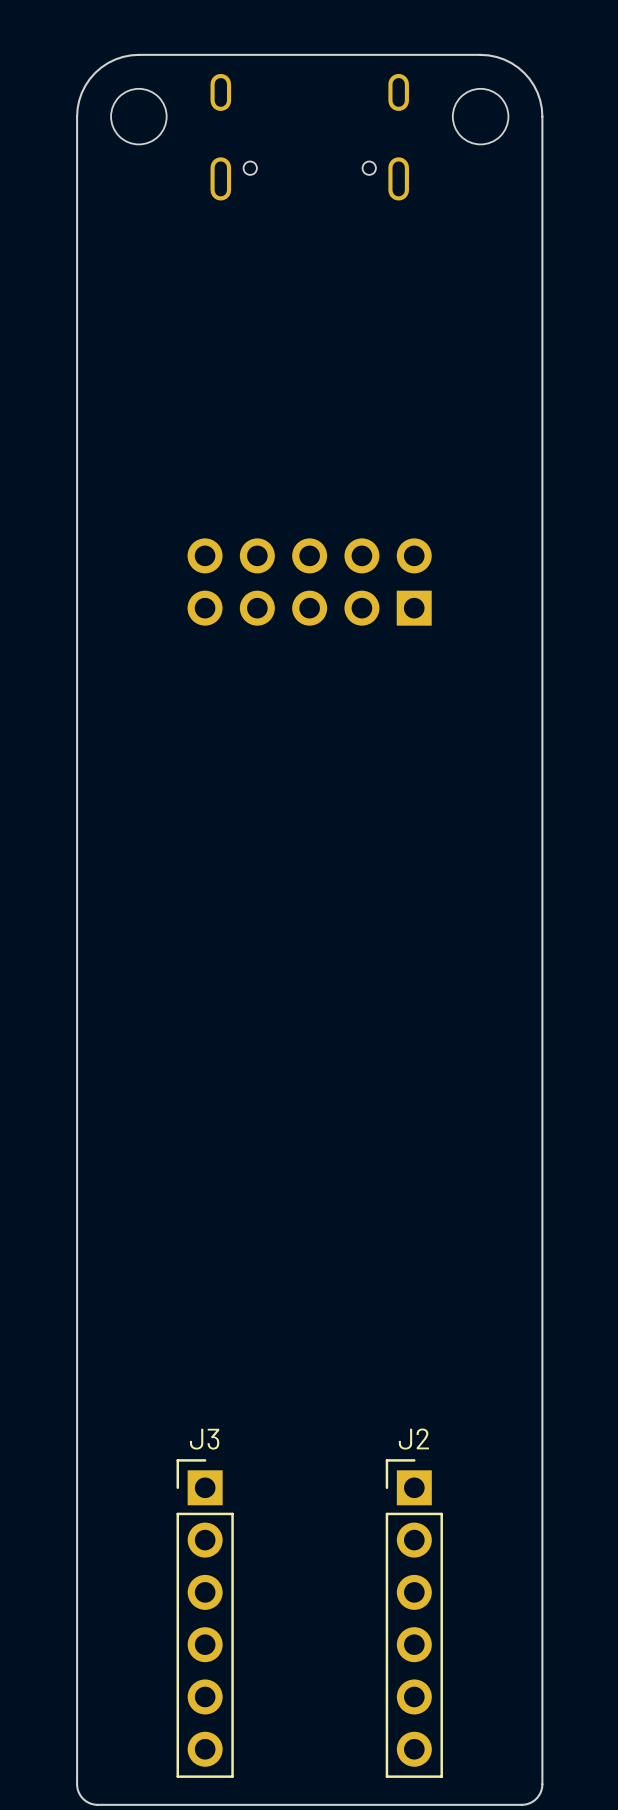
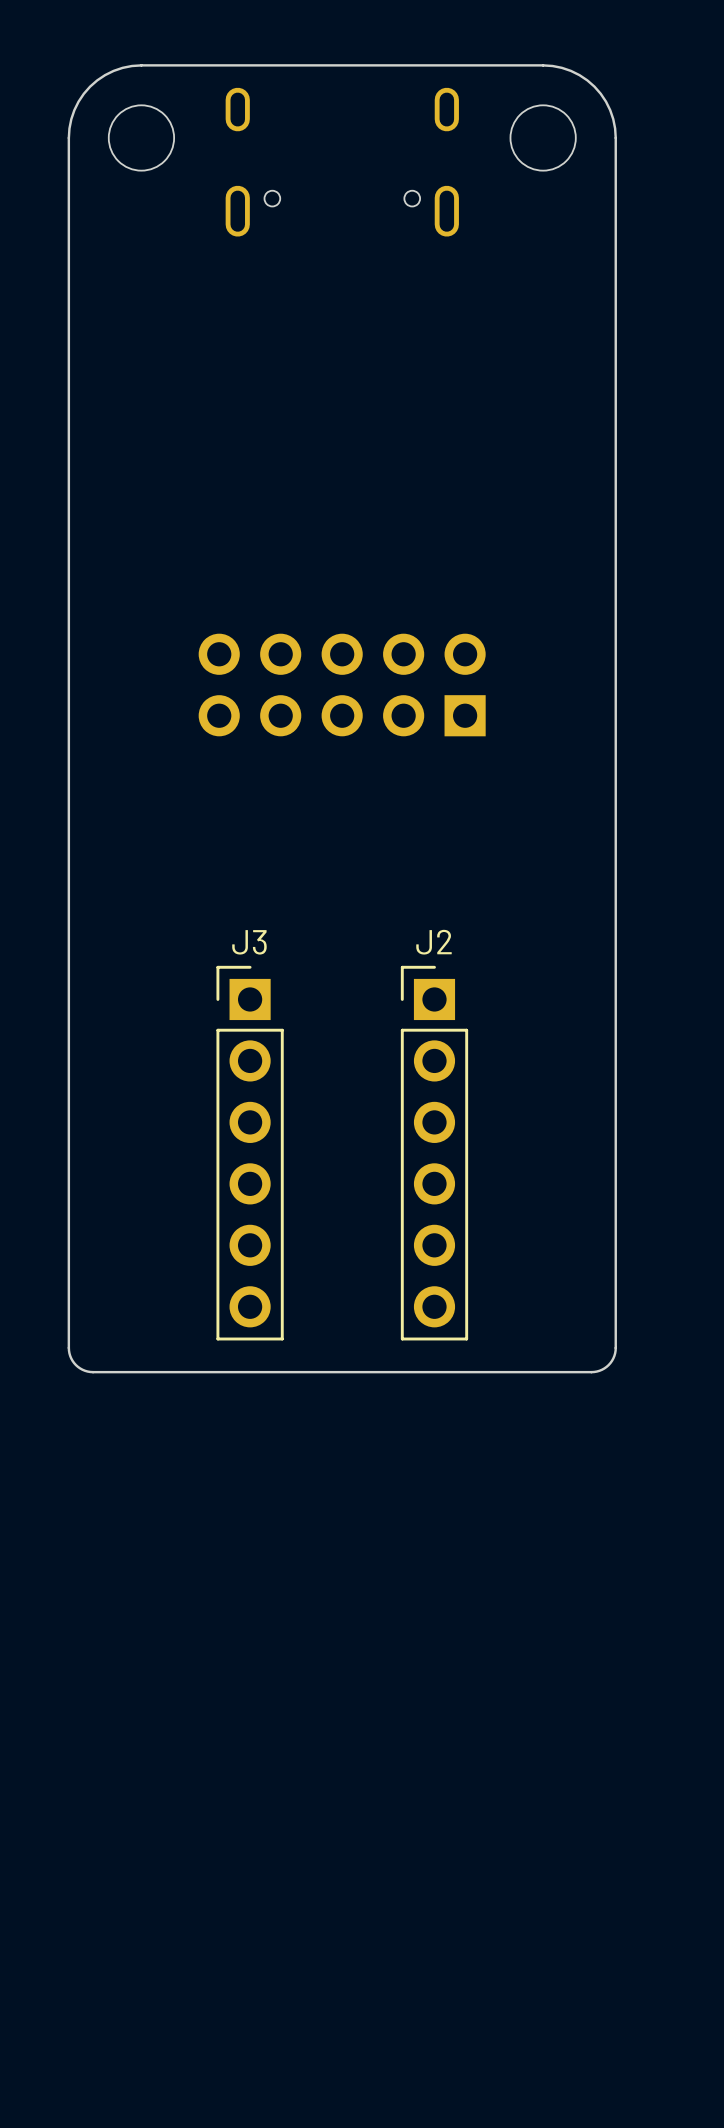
board edge: (542, 1146) (542, 1784) (541, 1791) (536, 1798) (530, 1802) (521, 1804) (97, 1804) (88, 1802) (80, 1795) (77, 1784) (77, 1146) -> (615, 1347) (614, 1355) (608, 1365) (602, 1369) (591, 1372) (93, 1372) (85, 1370) (75, 1365) (70, 1355) (68, 1347)
J3 position: (205, 1618) -> (250, 1153)
J2 position: (414, 1618) -> (434, 1153)

